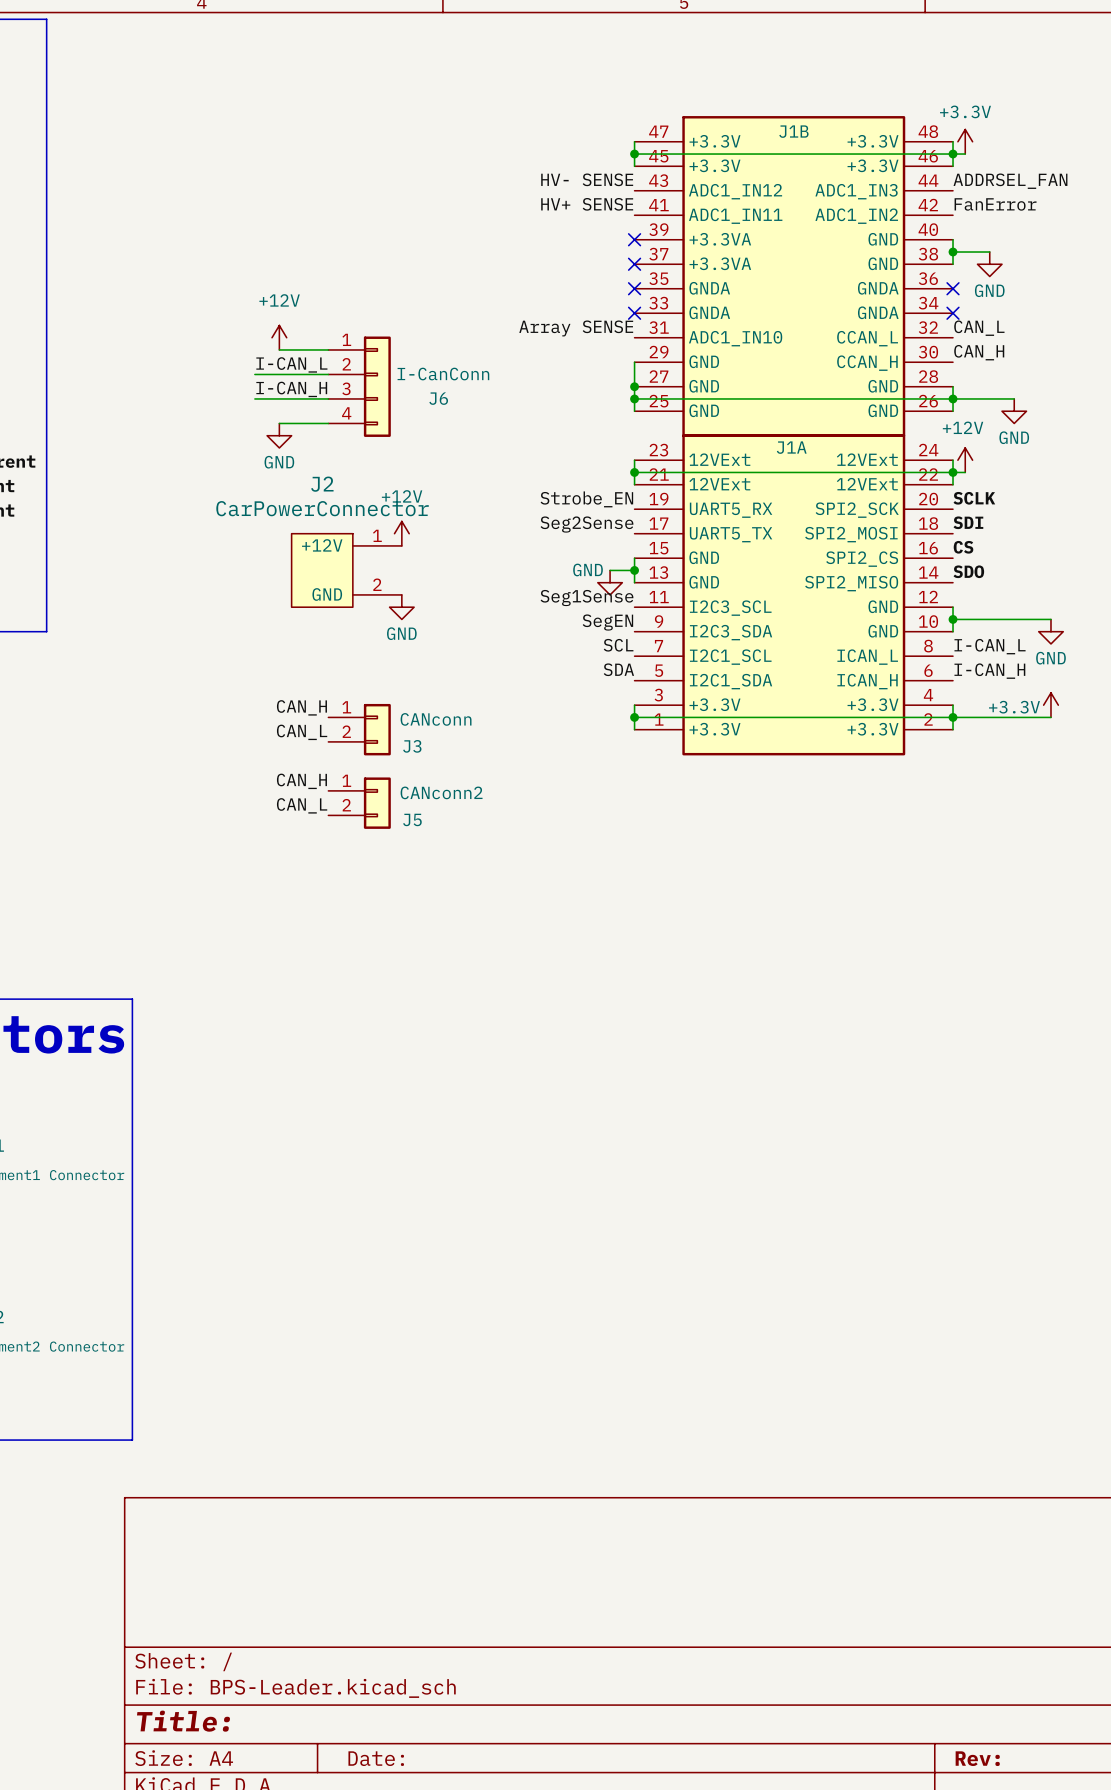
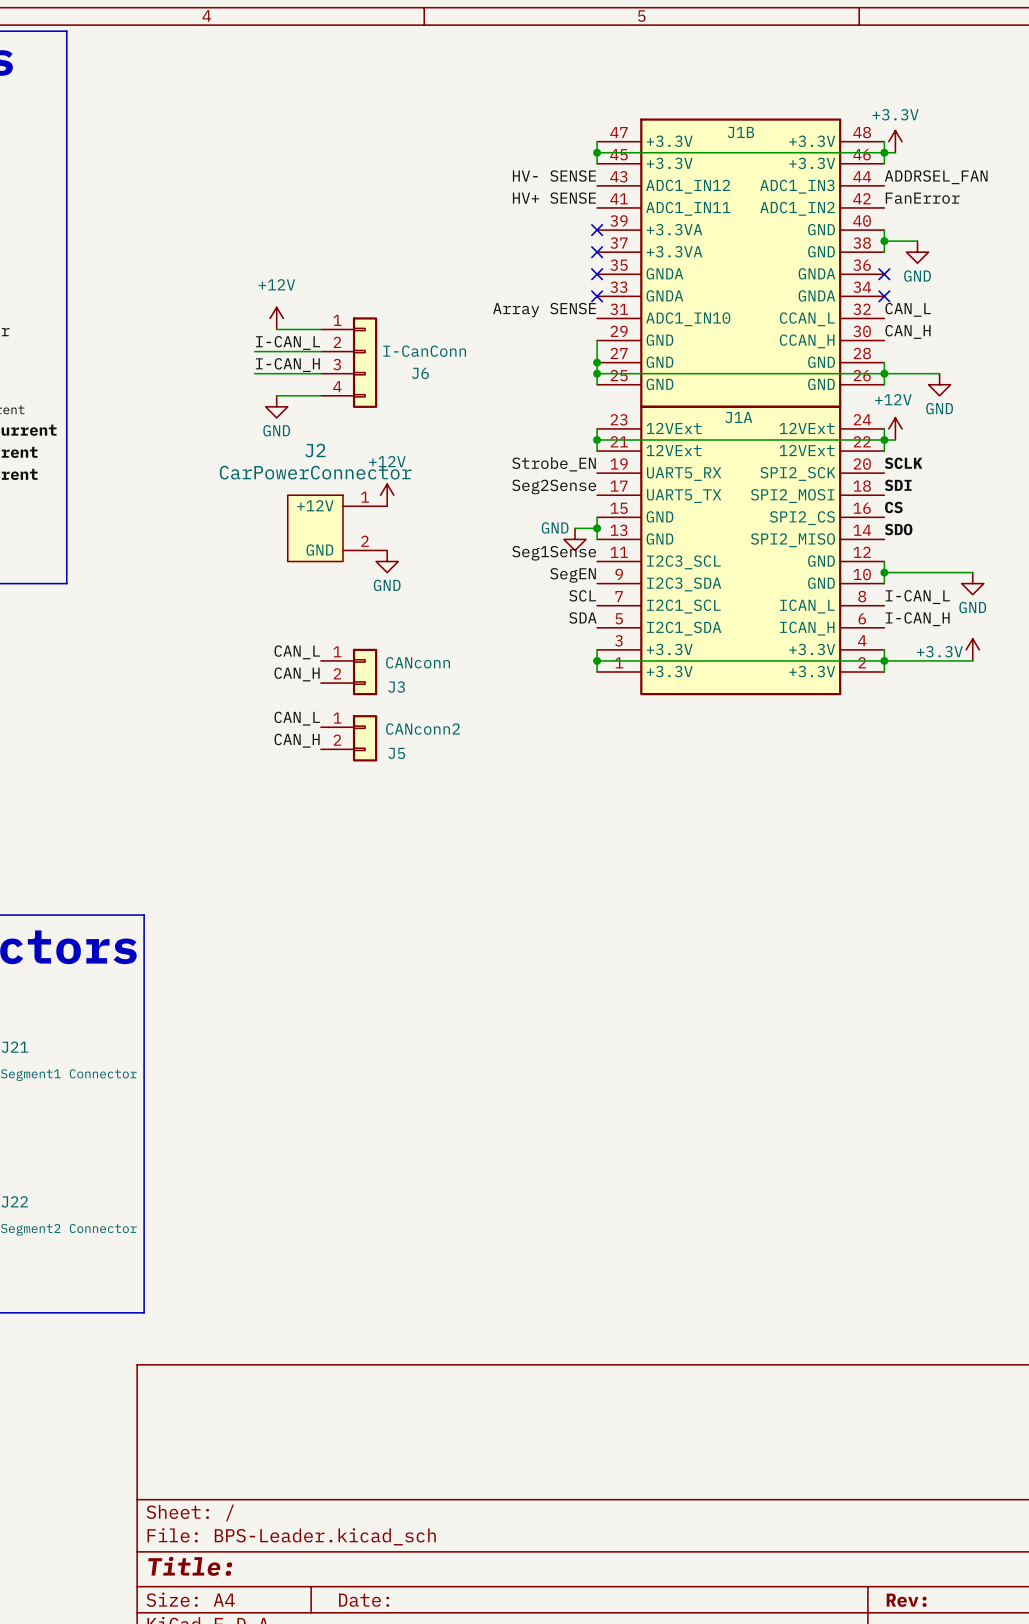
label: CAN_H (301, 707) -> CAN_L (297, 652)
label: CAN_L (302, 732) -> CAN_H (297, 674)
label: CAN_H (301, 781) -> CAN_L (297, 718)
label: CAN_L (302, 805) -> CAN_H (297, 740)

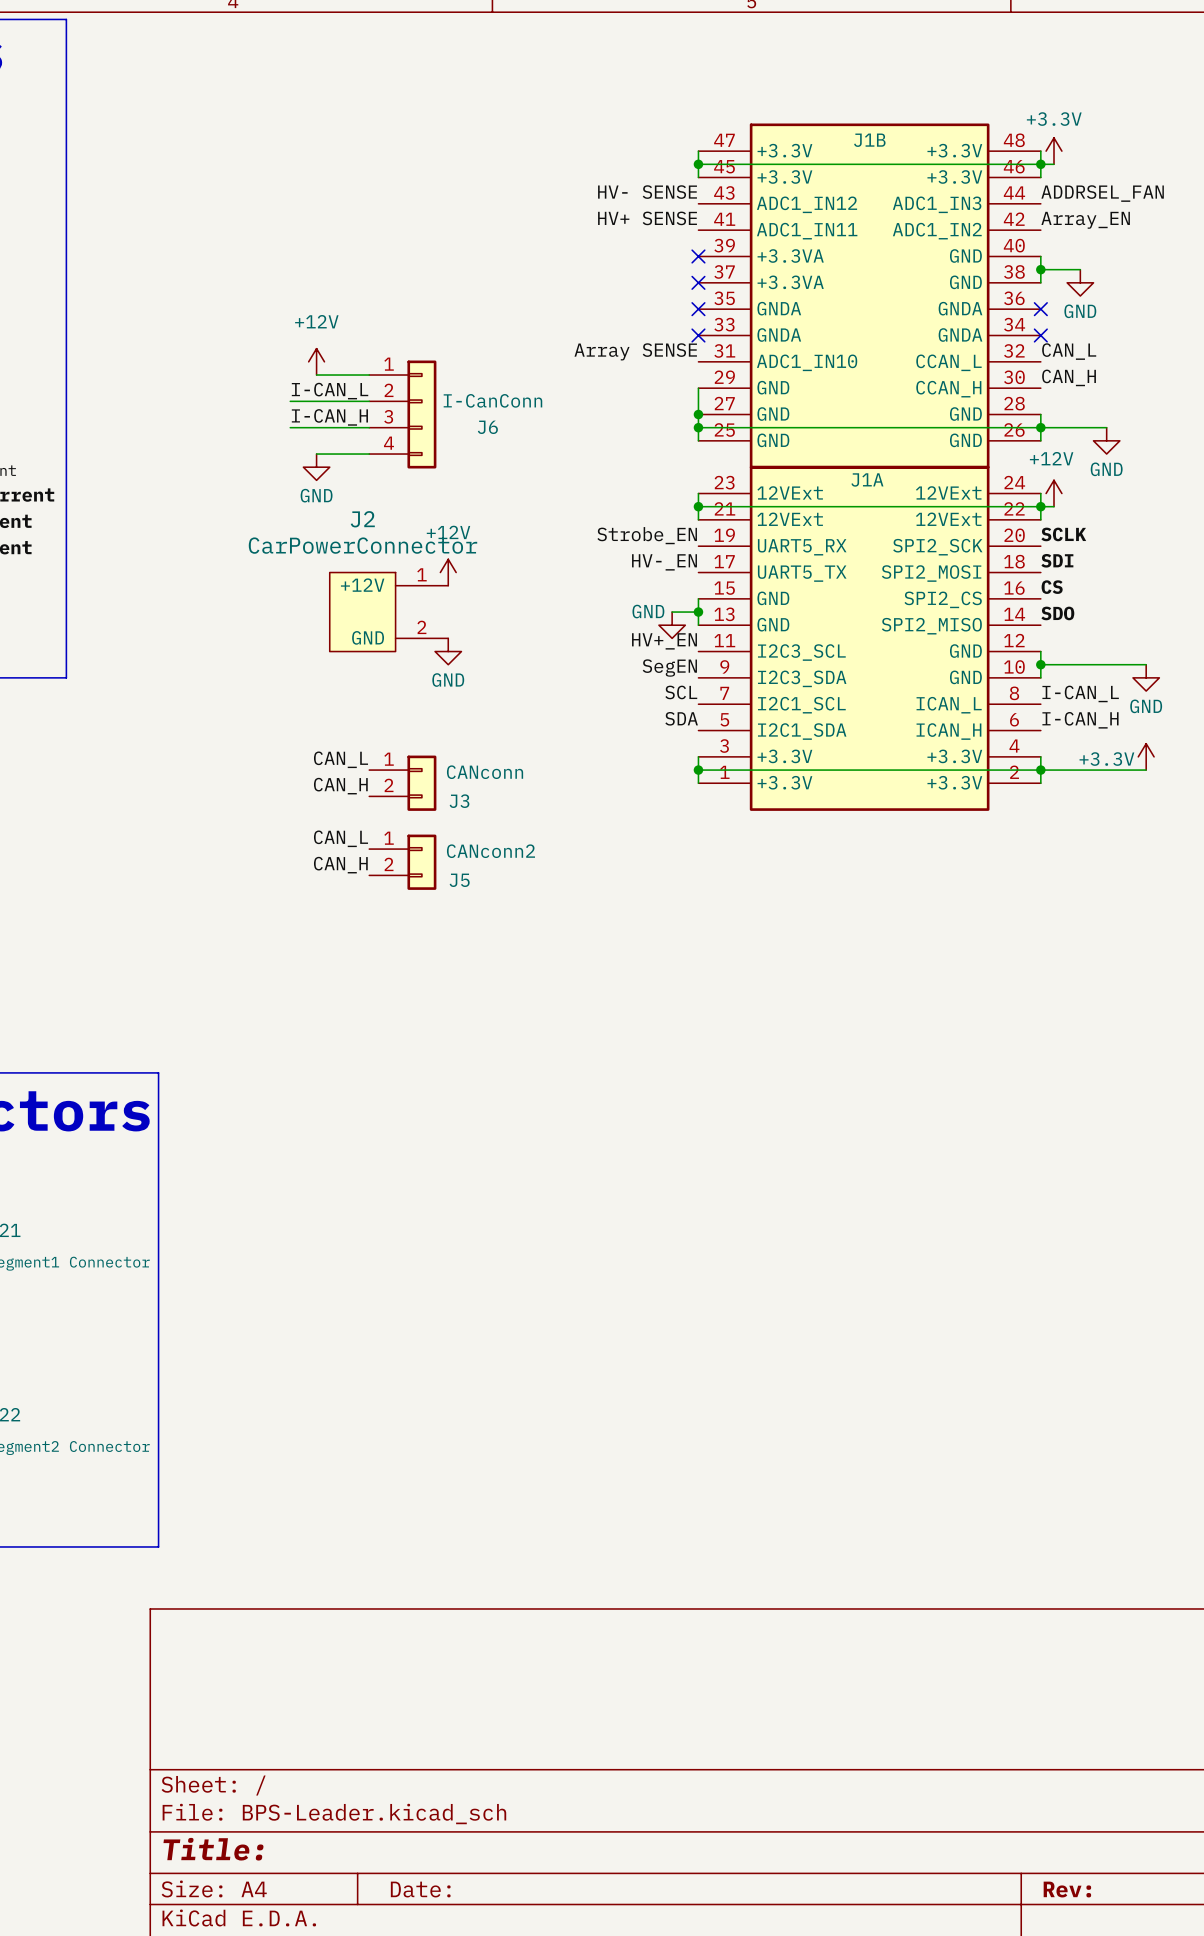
label: FanError (922, 198) -> Array_EN (1085, 220)
label: Seg2Sense (554, 486) -> HV-_EN (664, 562)
label: Seg1Sense (554, 553) -> HV+_EN (664, 641)

